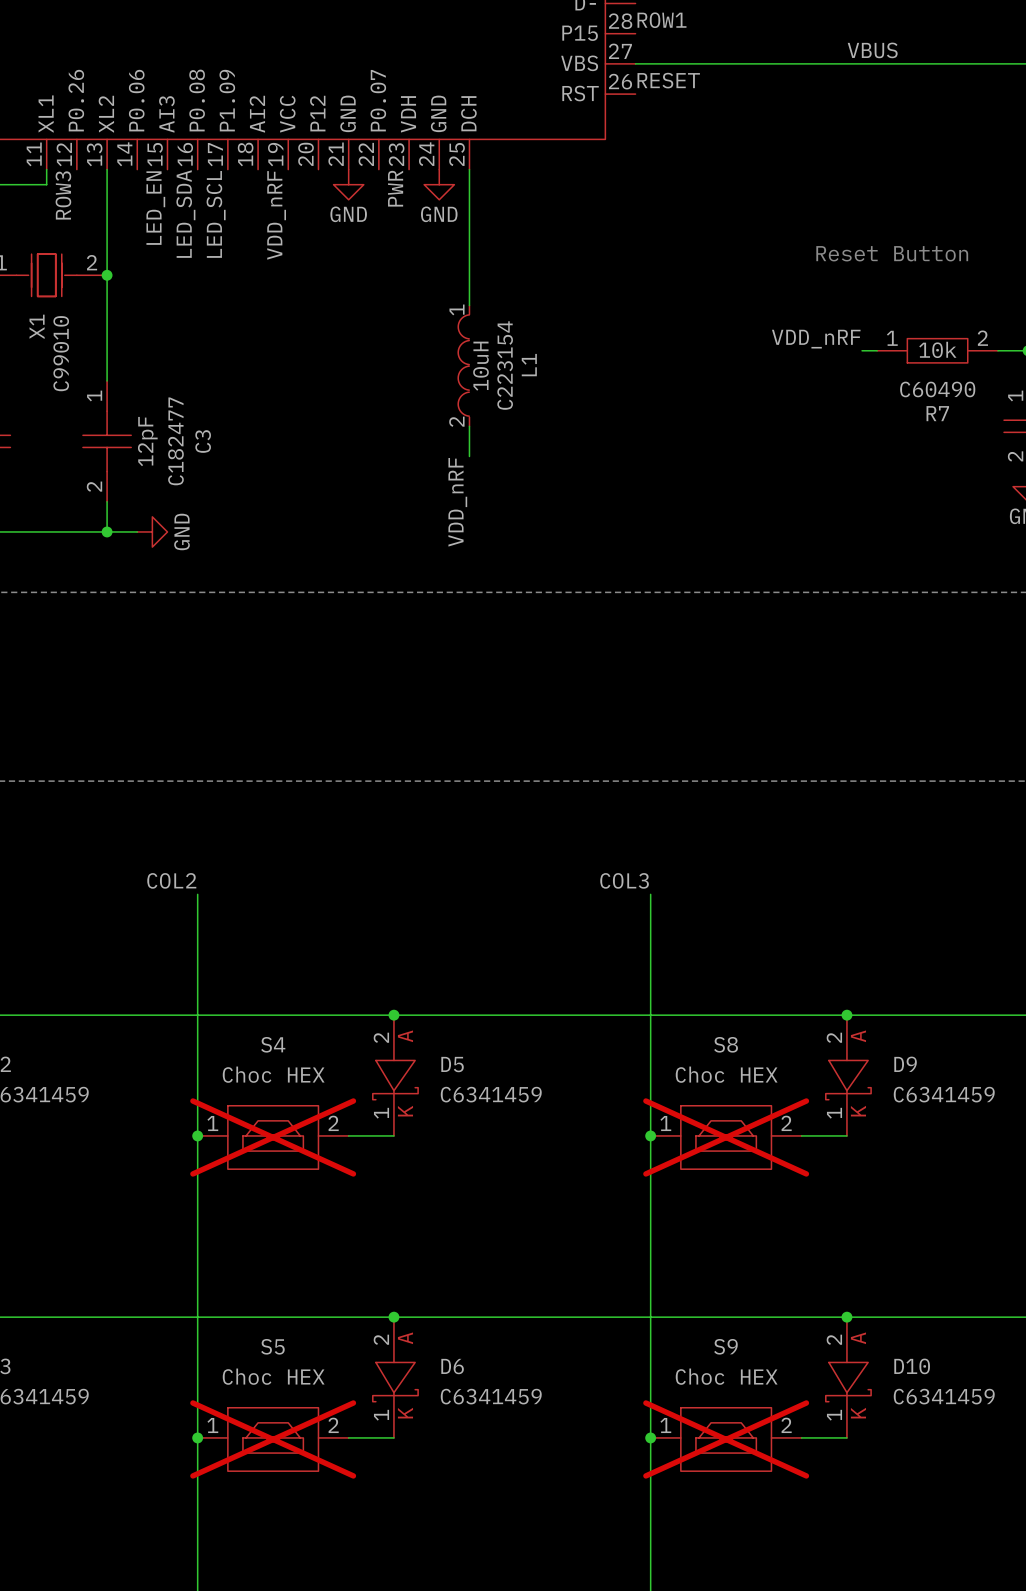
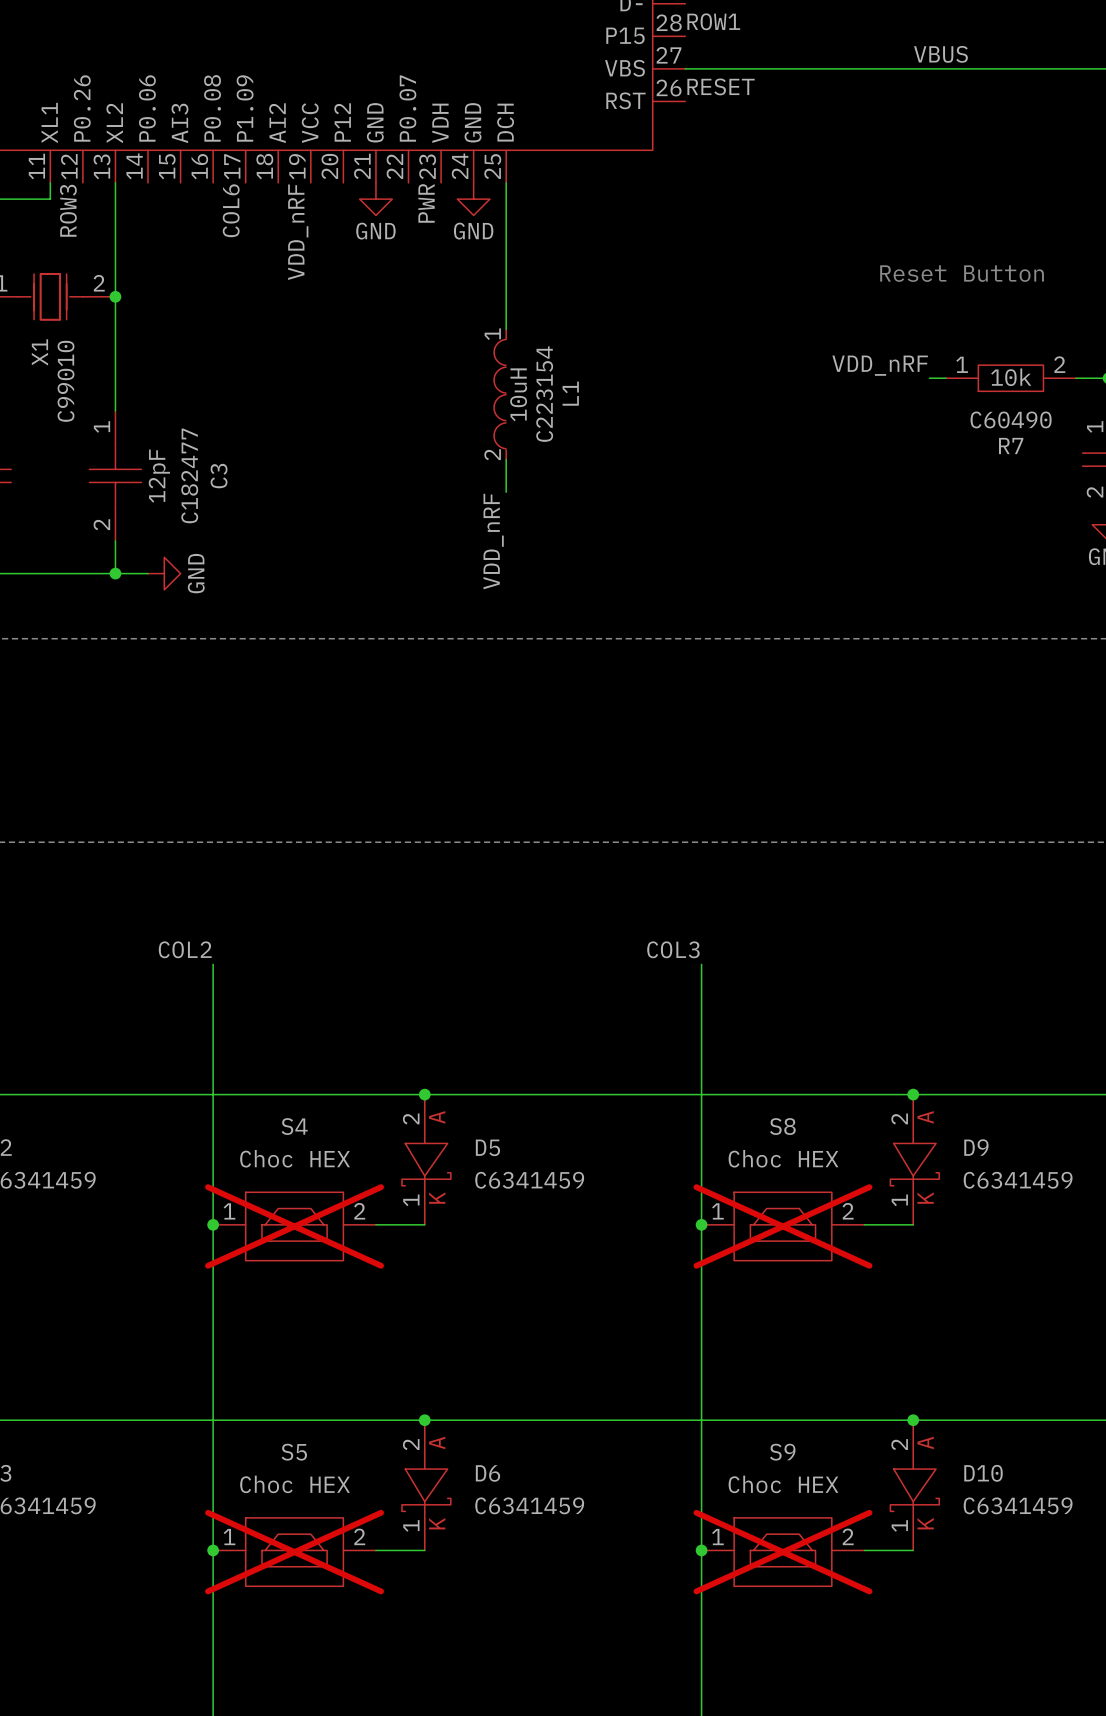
label: LED_EN (155, 208) -> none
label: LED_SDA (185, 214) -> none
label: LED_SCL (216, 214) -> COL6 (231, 210)

